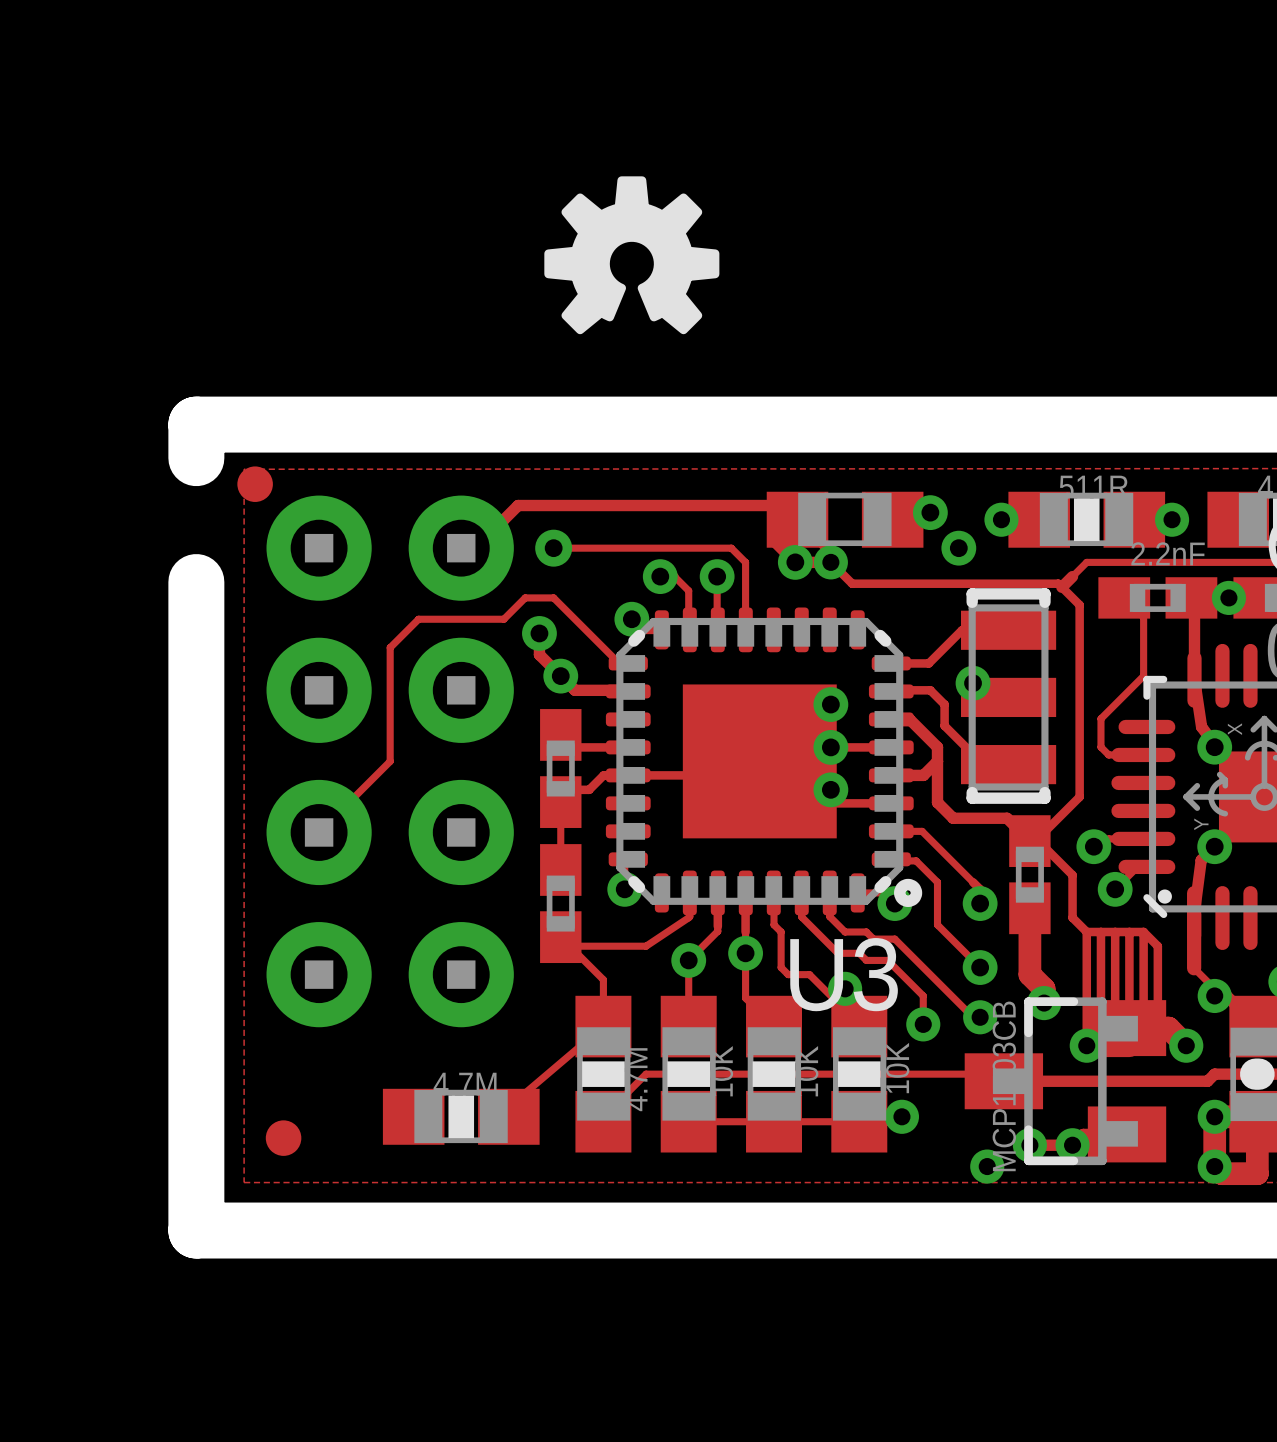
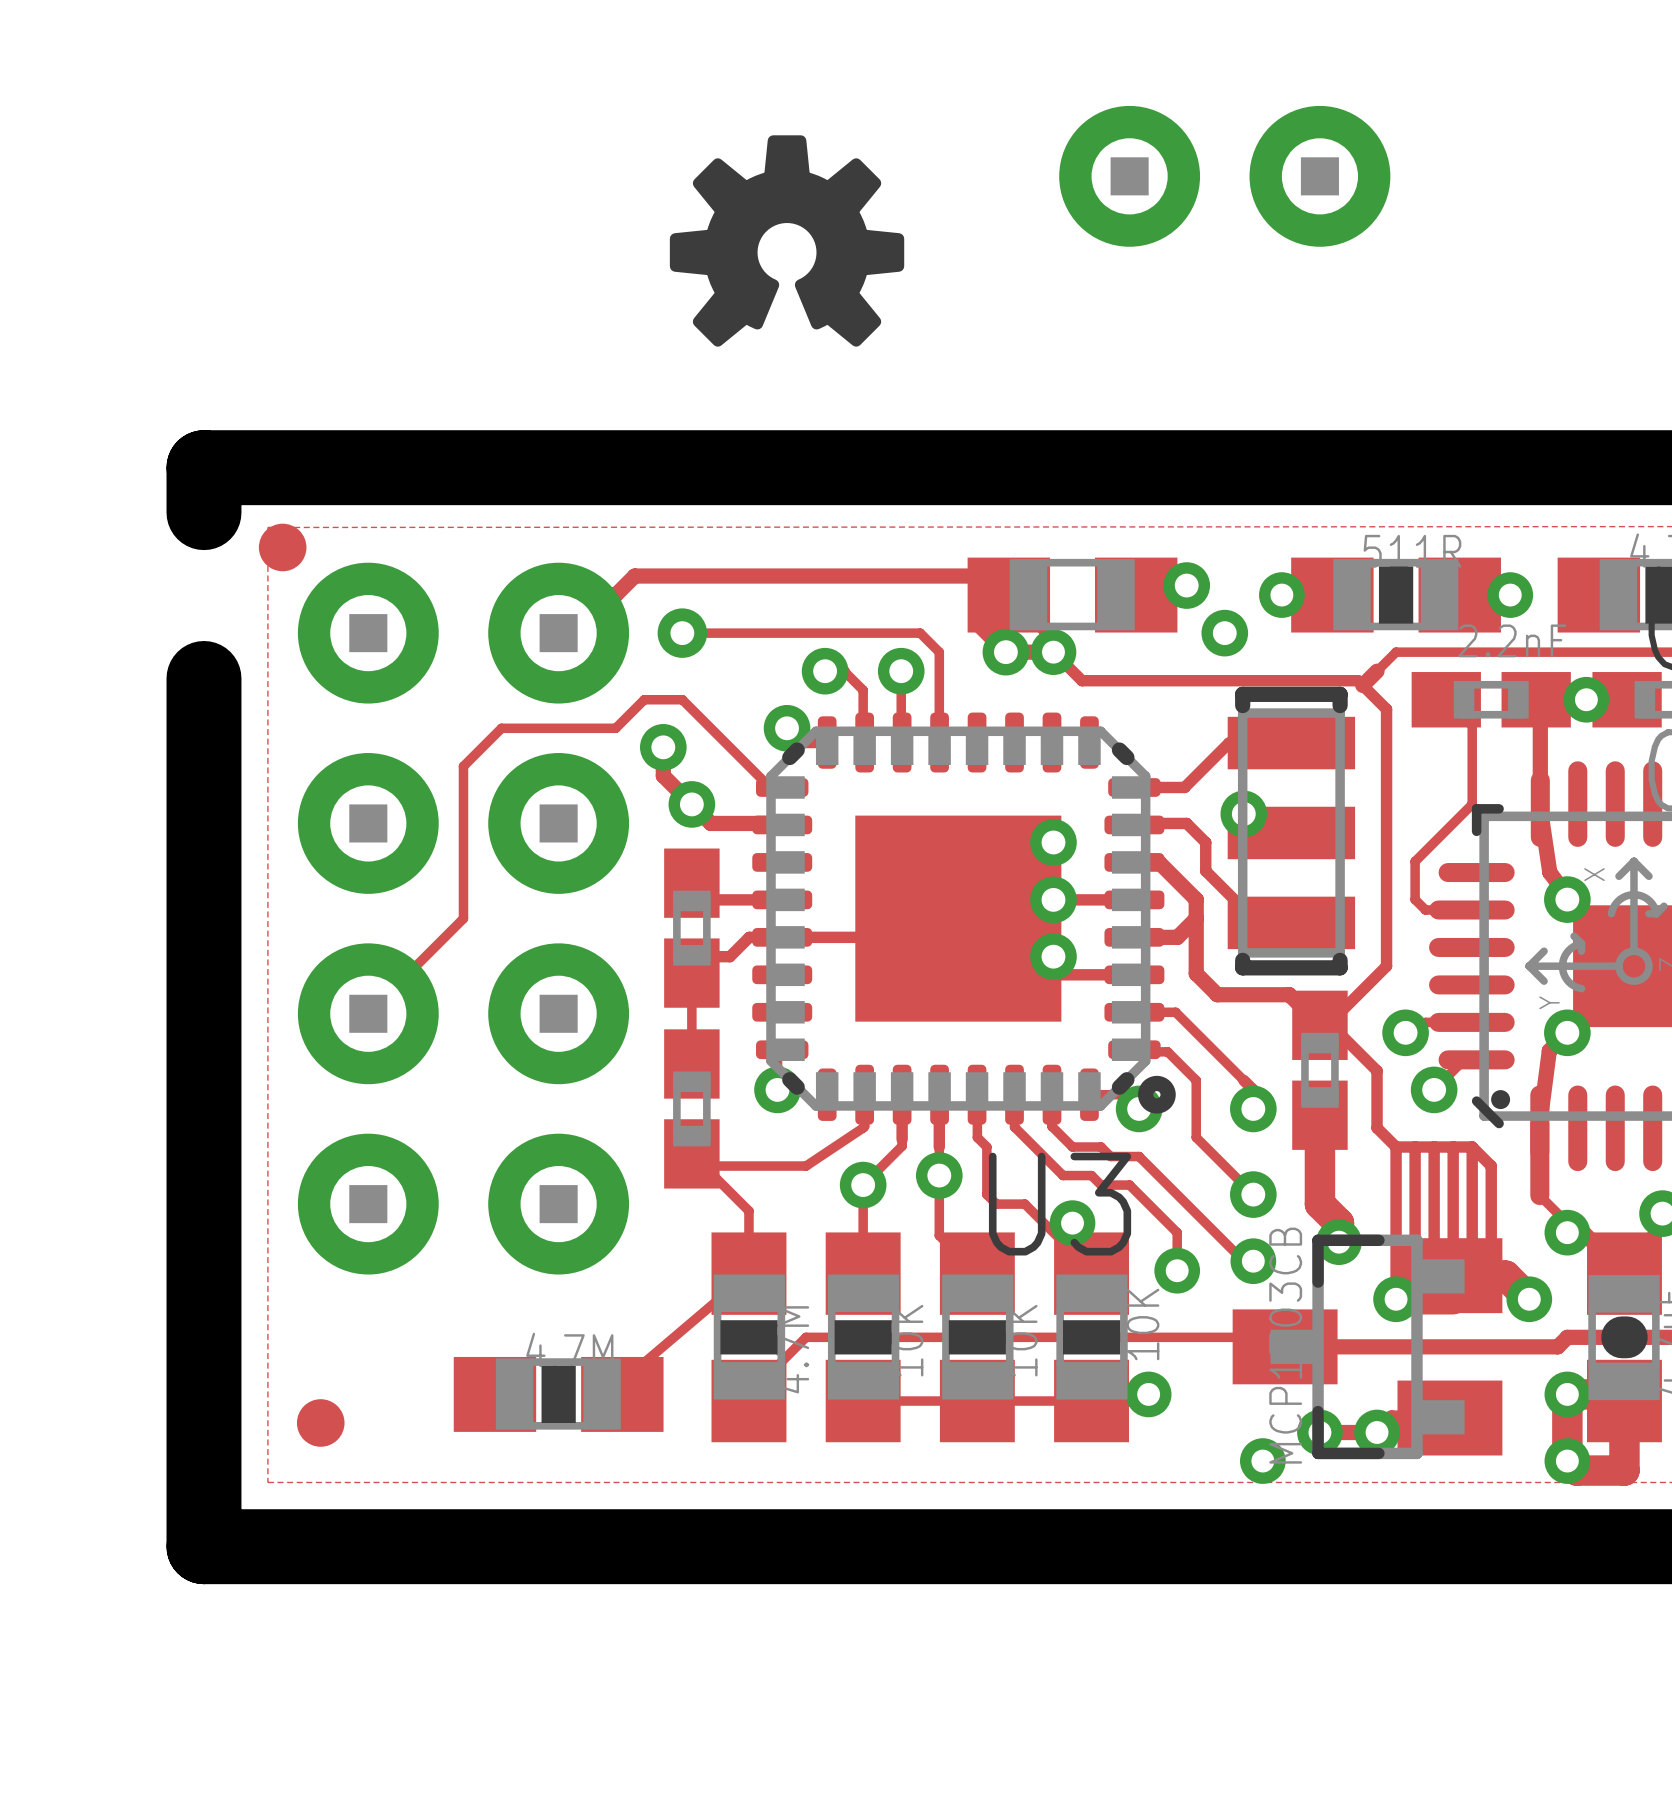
part: none -> (1129, 176)
part: none -> (1319, 176)

